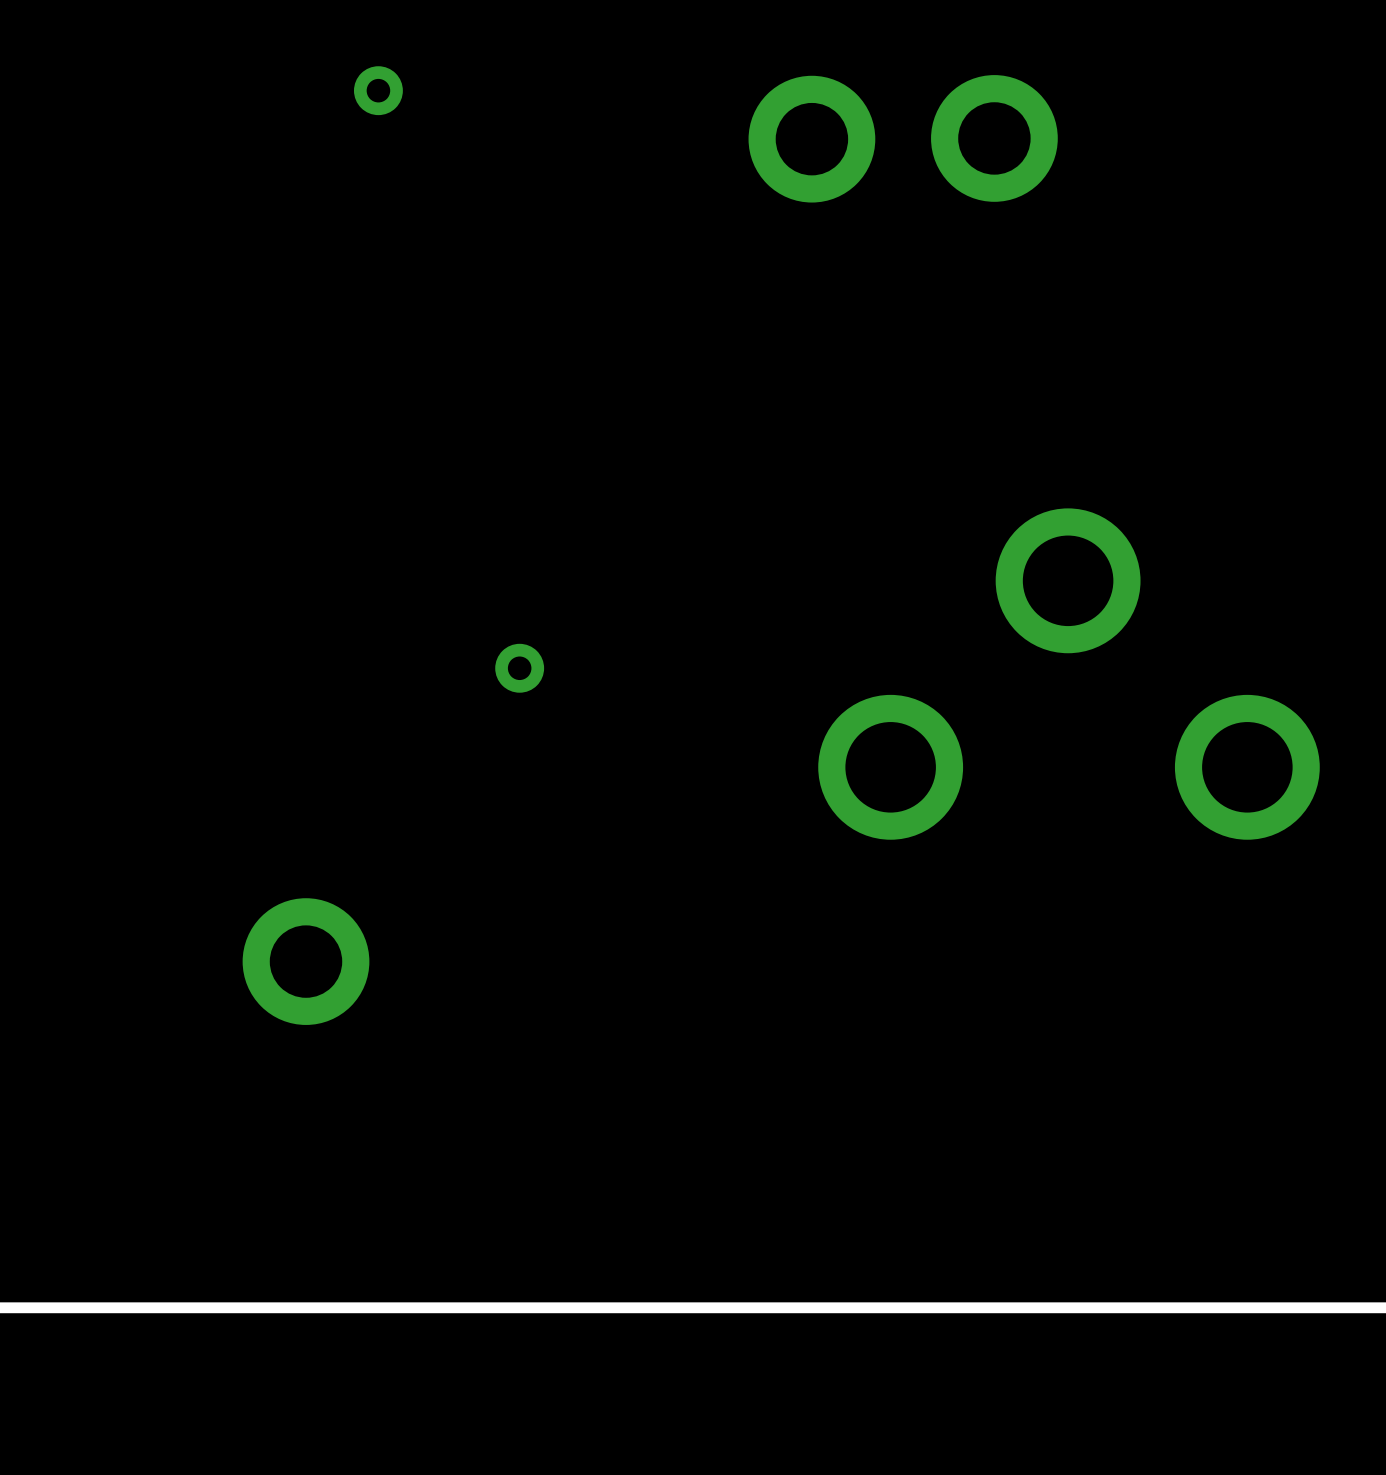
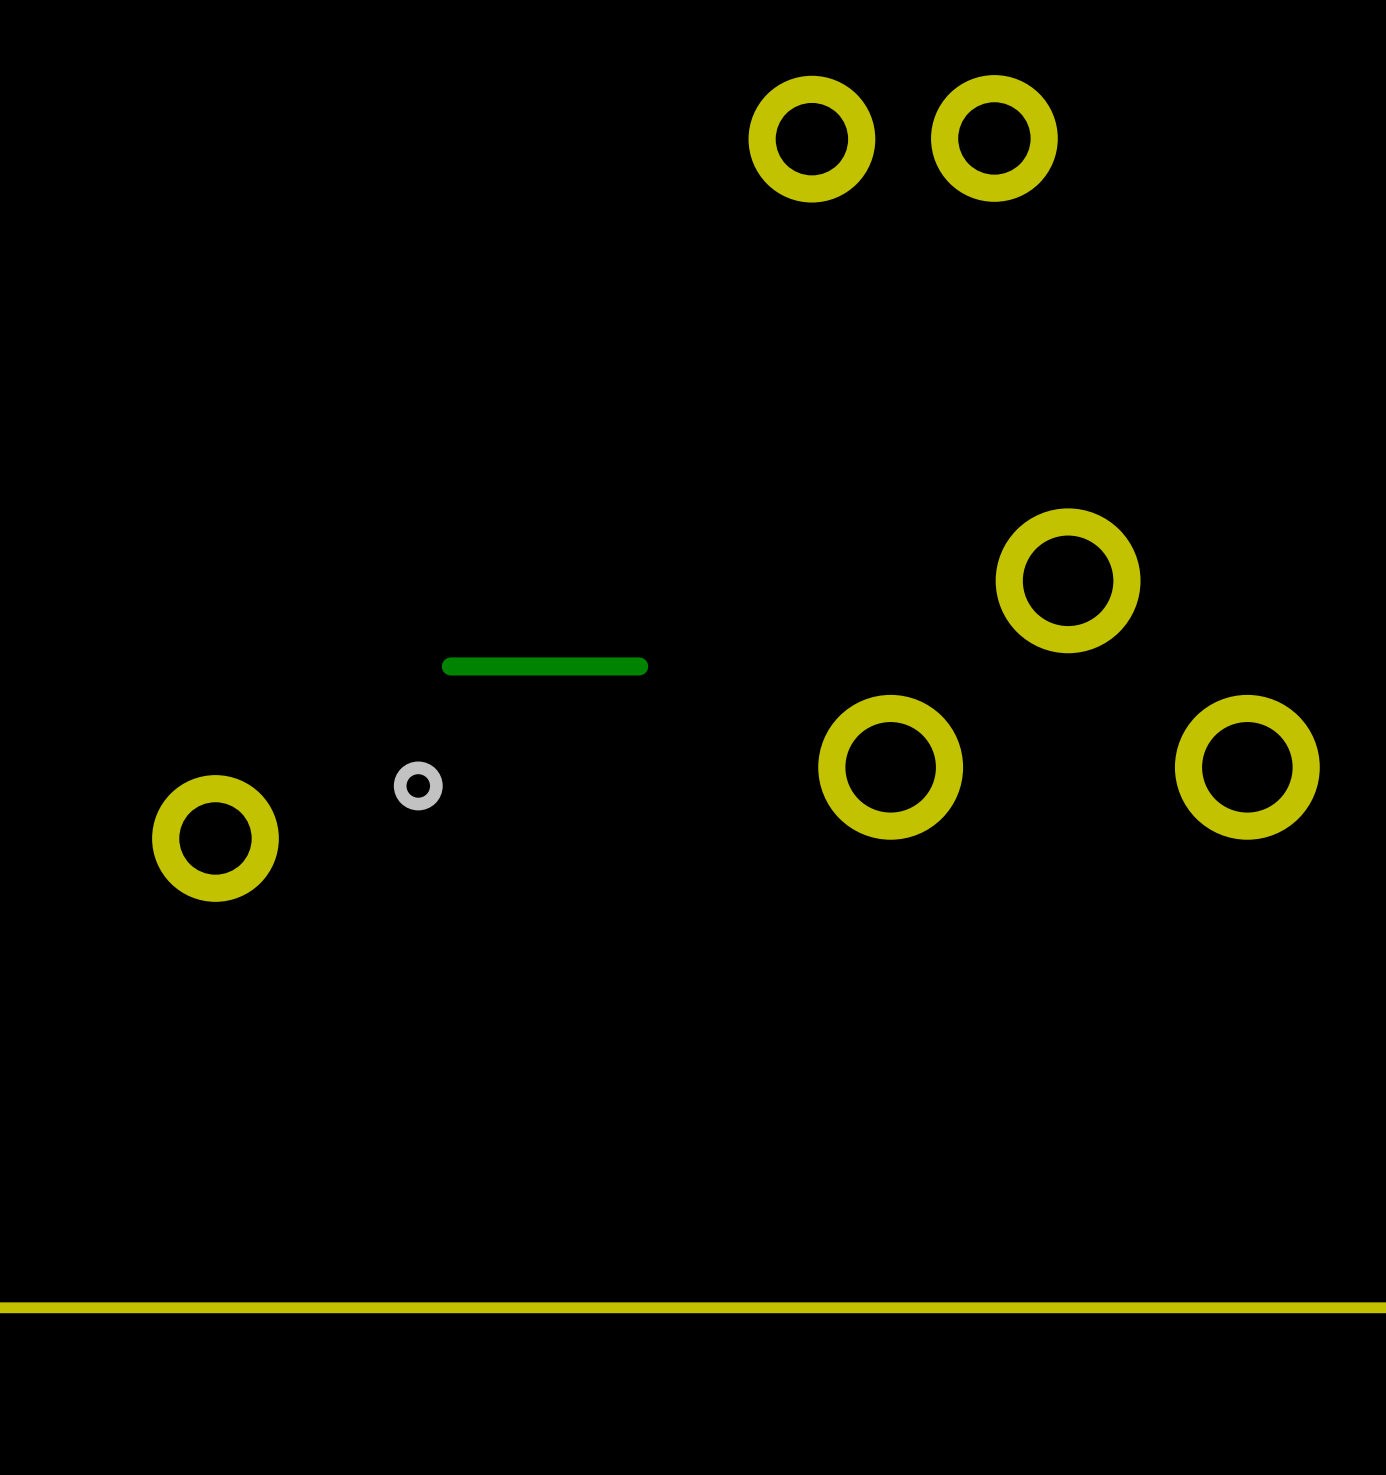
via: (378, 90) -> none
track: none -> (639, 666) (450, 666)
via position: (519, 668) -> (418, 785)
part position: (306, 961) -> (215, 838)

